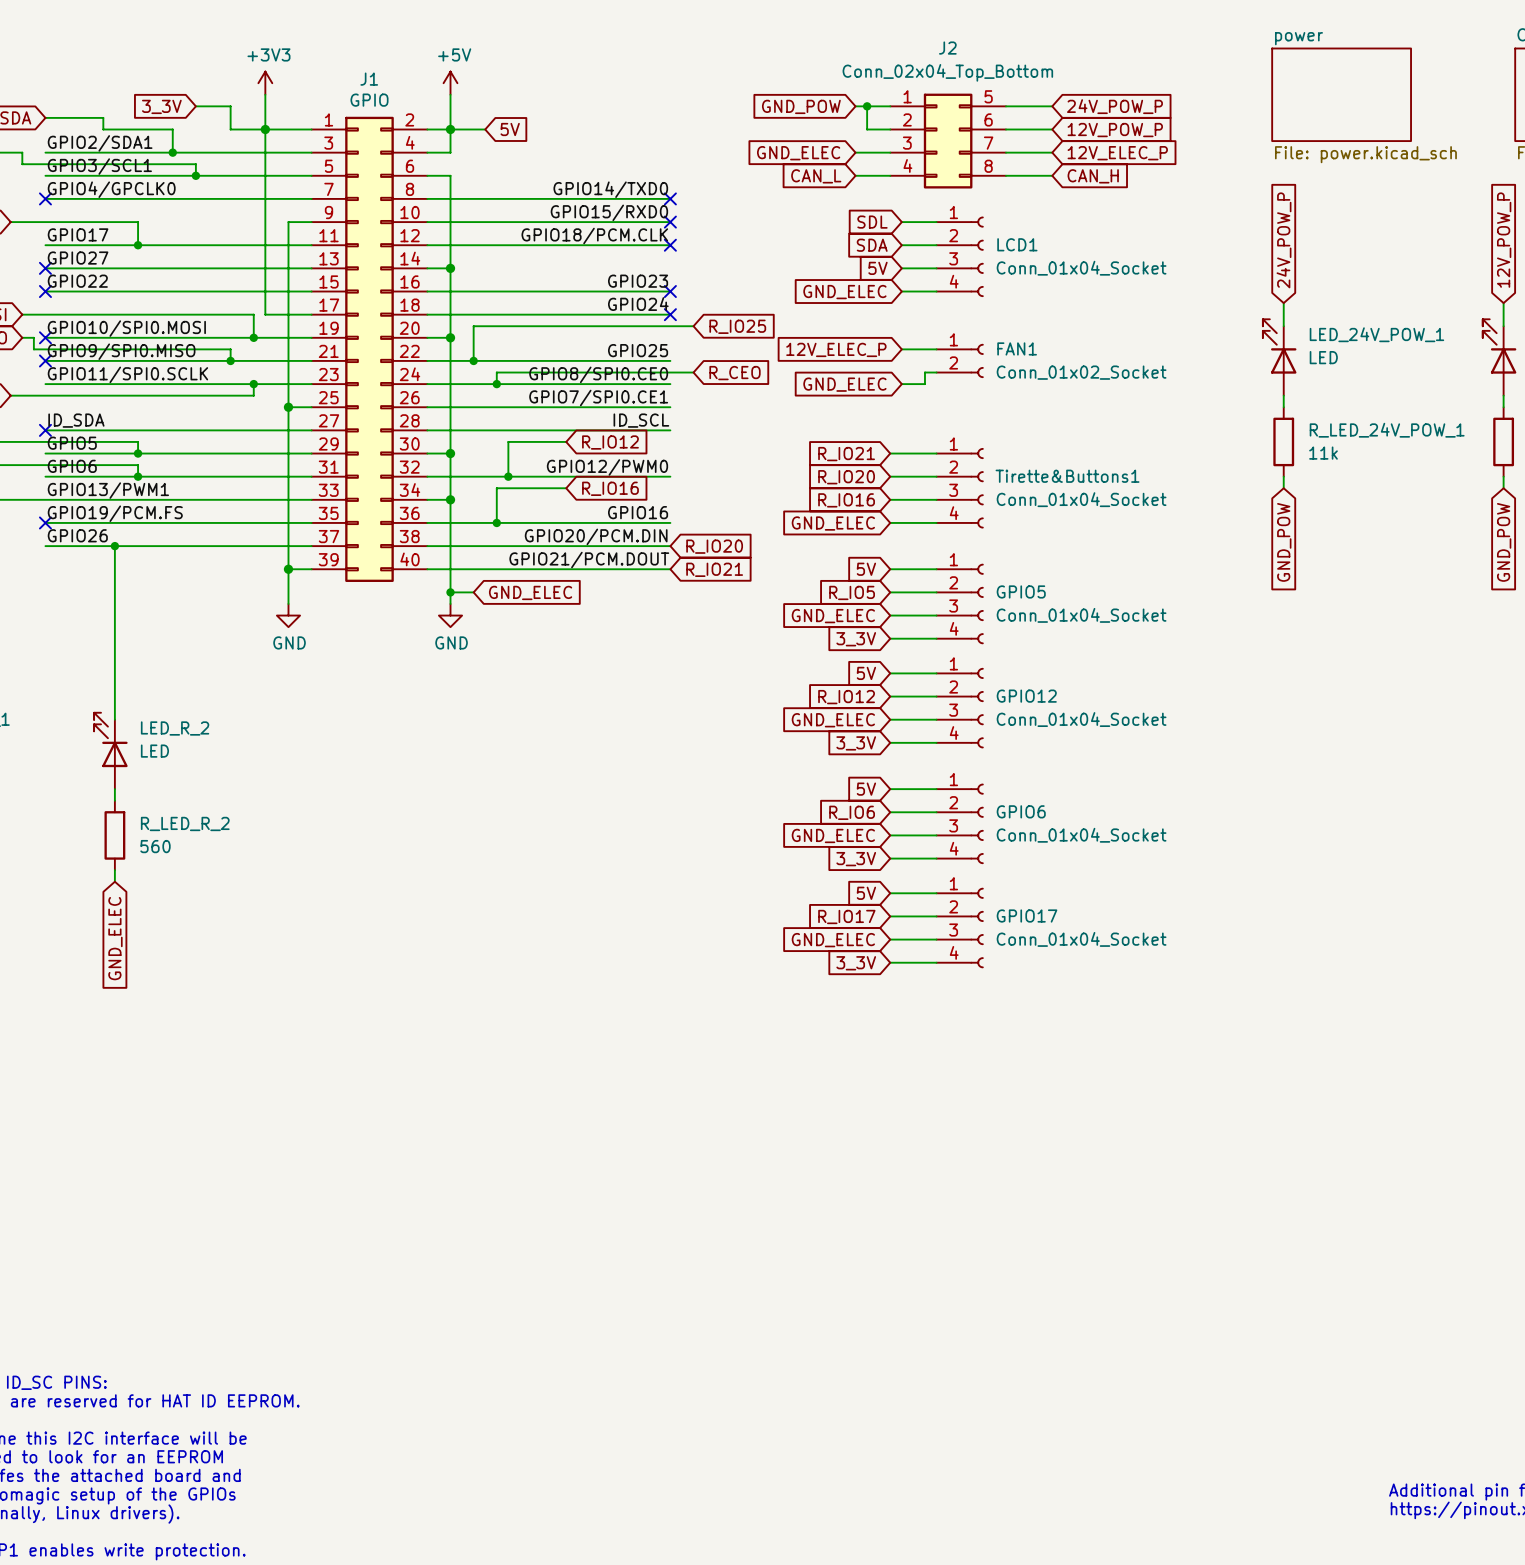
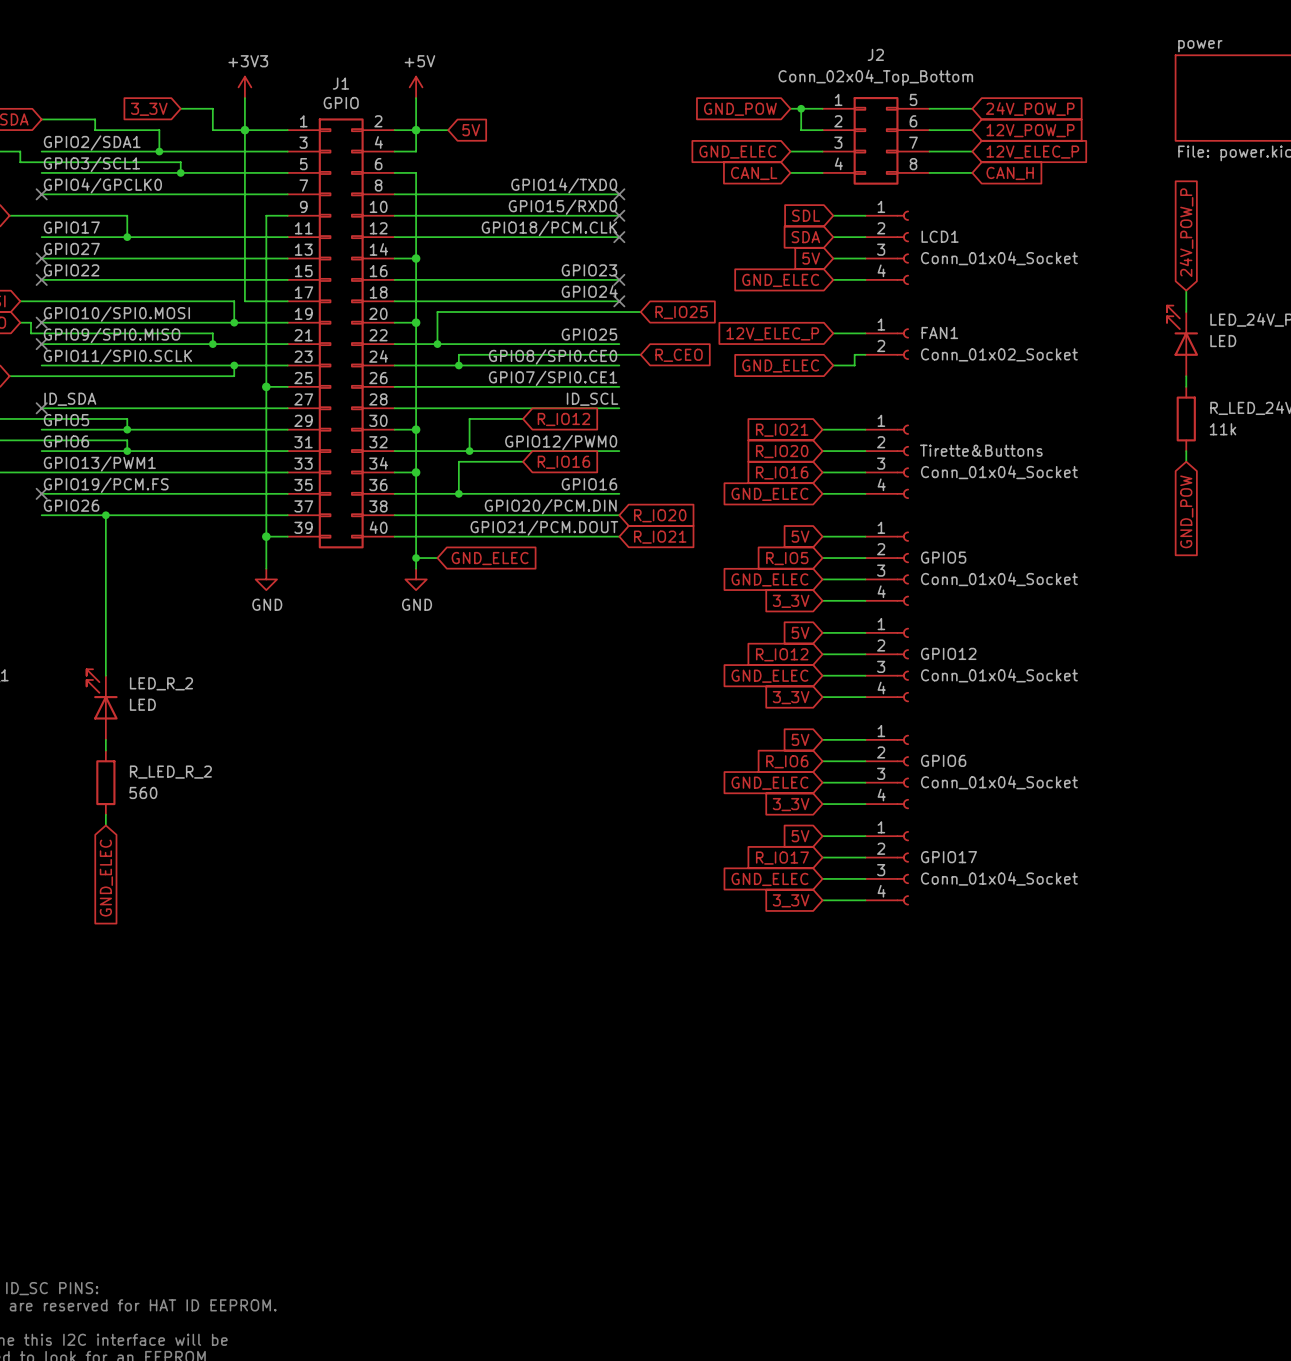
Tirette&Buttons1 name: Tirette&Buttons1 (1067, 476) -> Tirette&Buttons (981, 450)

